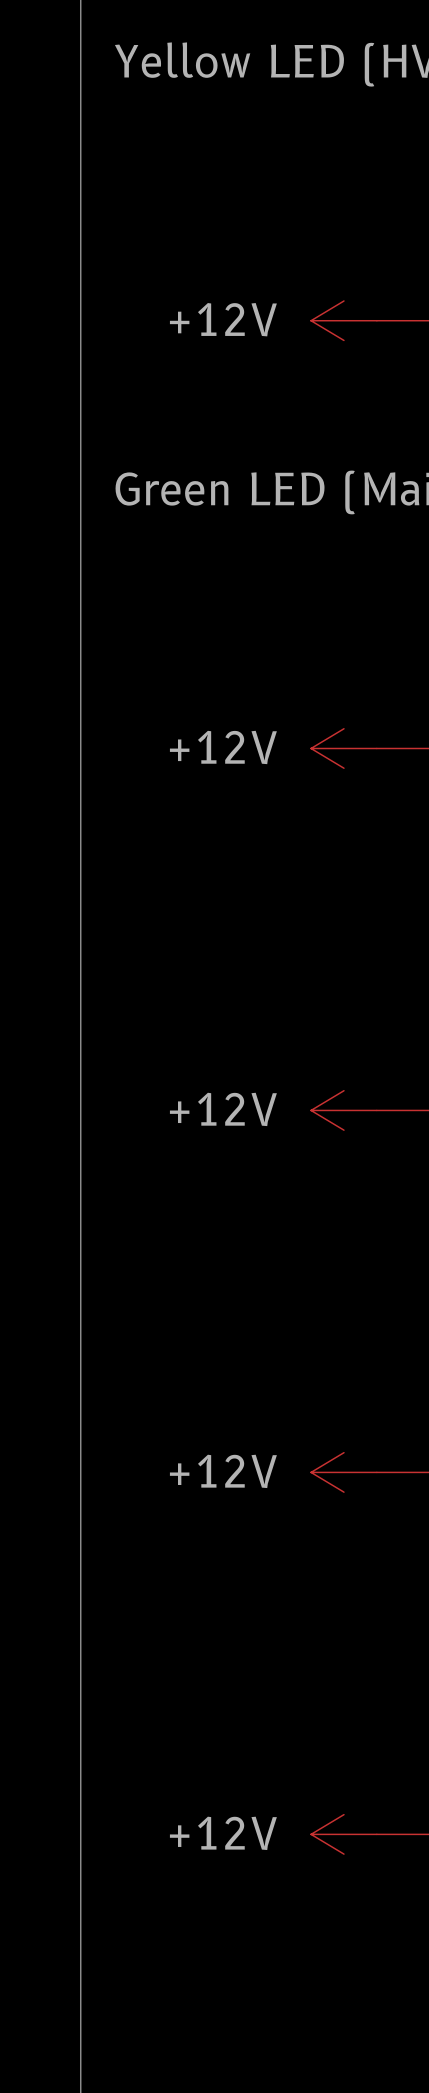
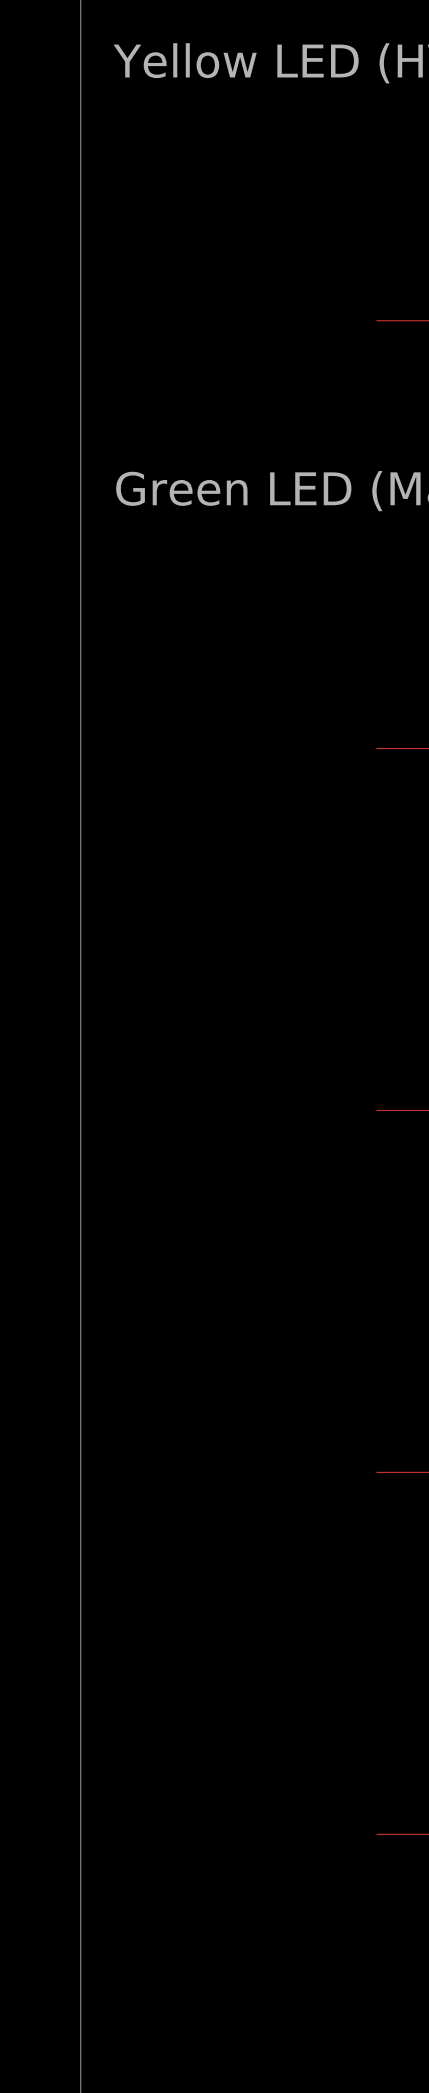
power symbol: +12V (343, 320) -> none
power symbol: +12V (343, 748) -> none
power symbol: +12V (343, 1110) -> none
power symbol: +12V (343, 1472) -> none
power symbol: +12V (343, 1834) -> none

